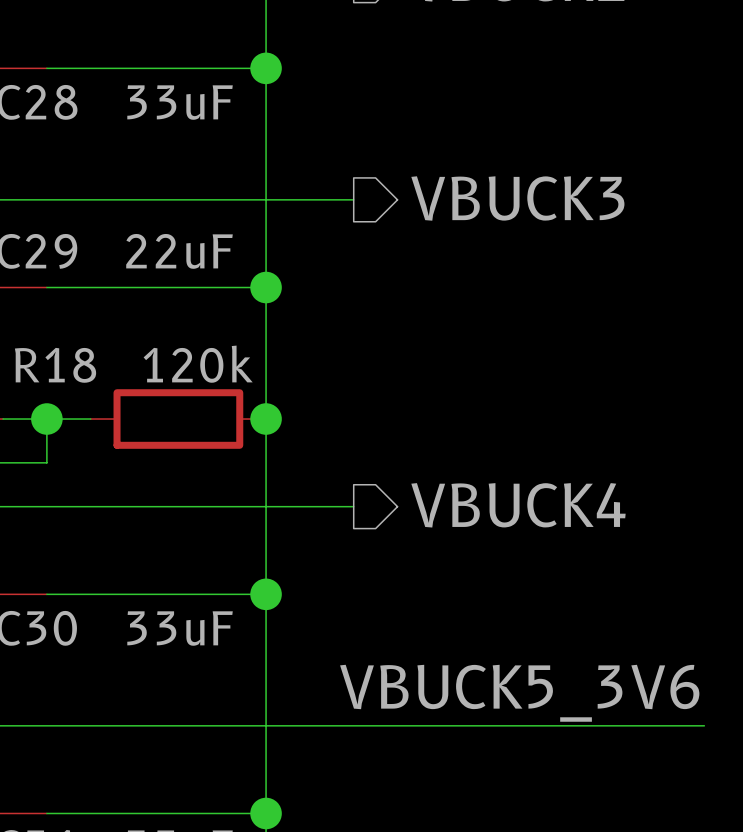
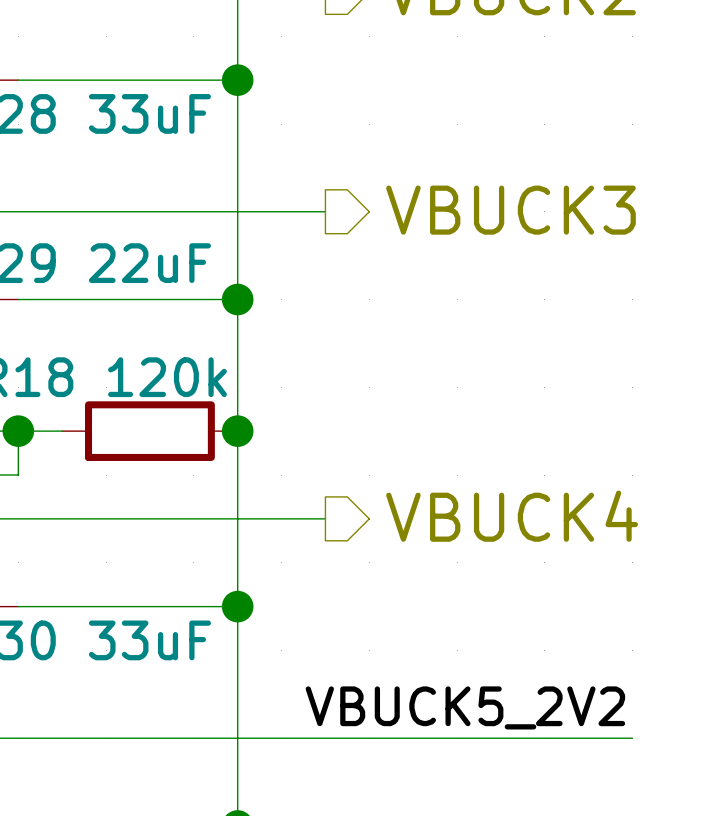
label: VBUCK5_3V6 (519, 693) -> VBUCK5_2V2 (465, 707)
wire: (660, 725) (704, 725) -> none

